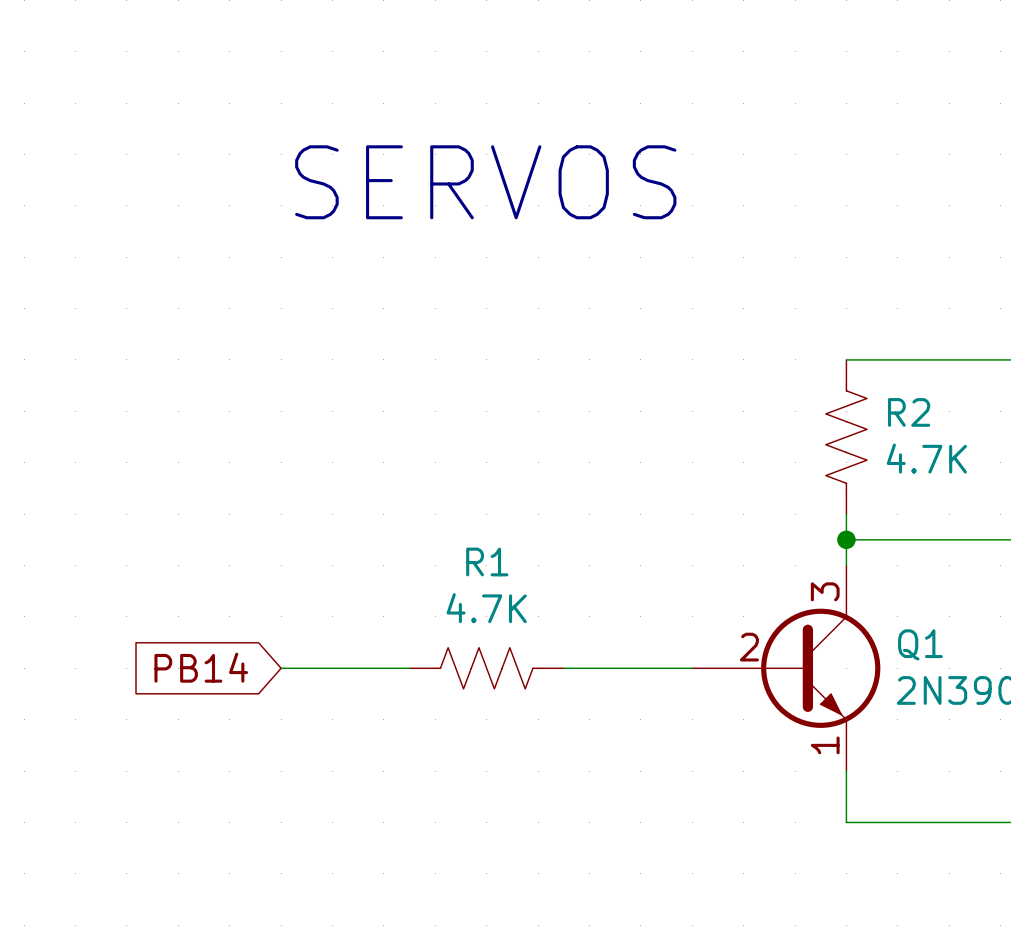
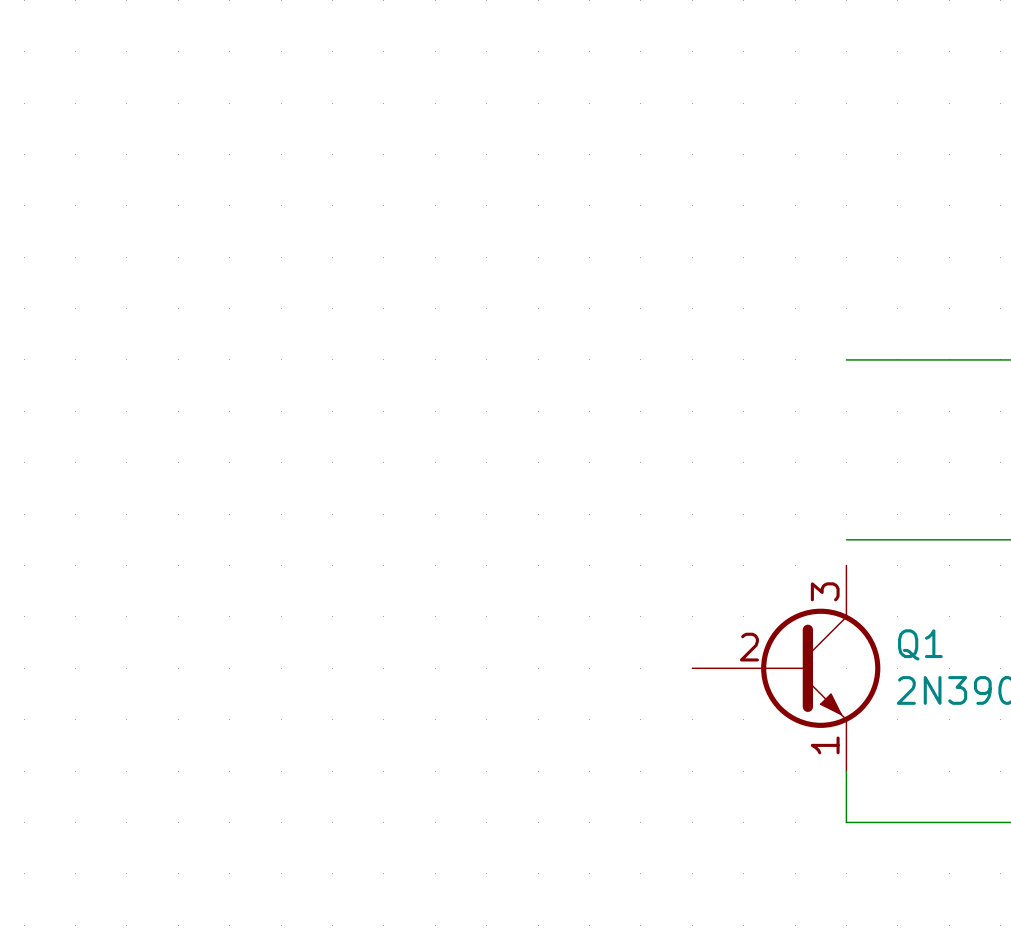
text: SERVOS (485, 182) -> none
R2: 4.7K (846, 437) -> none
wire: (846, 514) (846, 565) -> none
junction: (846, 539) -> none
global label: PB14 (201, 667) -> none
wire: (281, 668) (409, 668) -> none
R1: 4.7K (486, 668) -> none
wire: (563, 668) (692, 668) -> none

